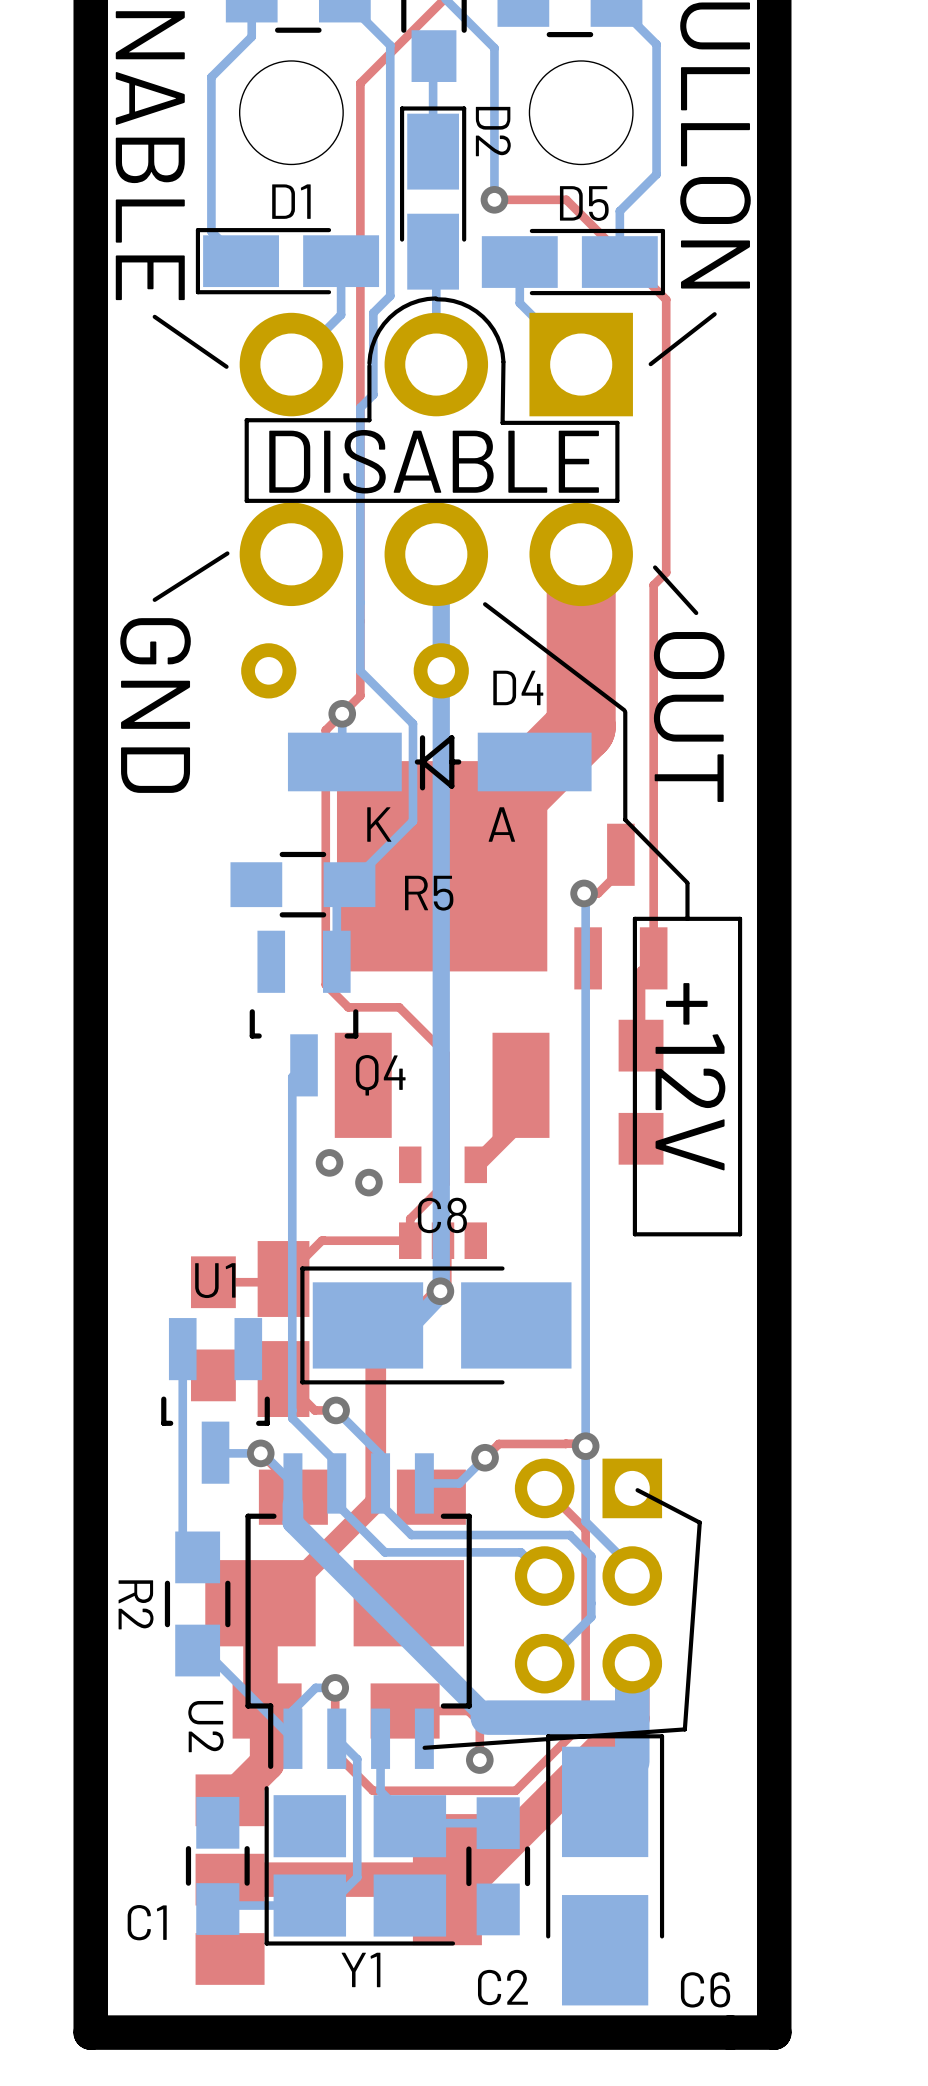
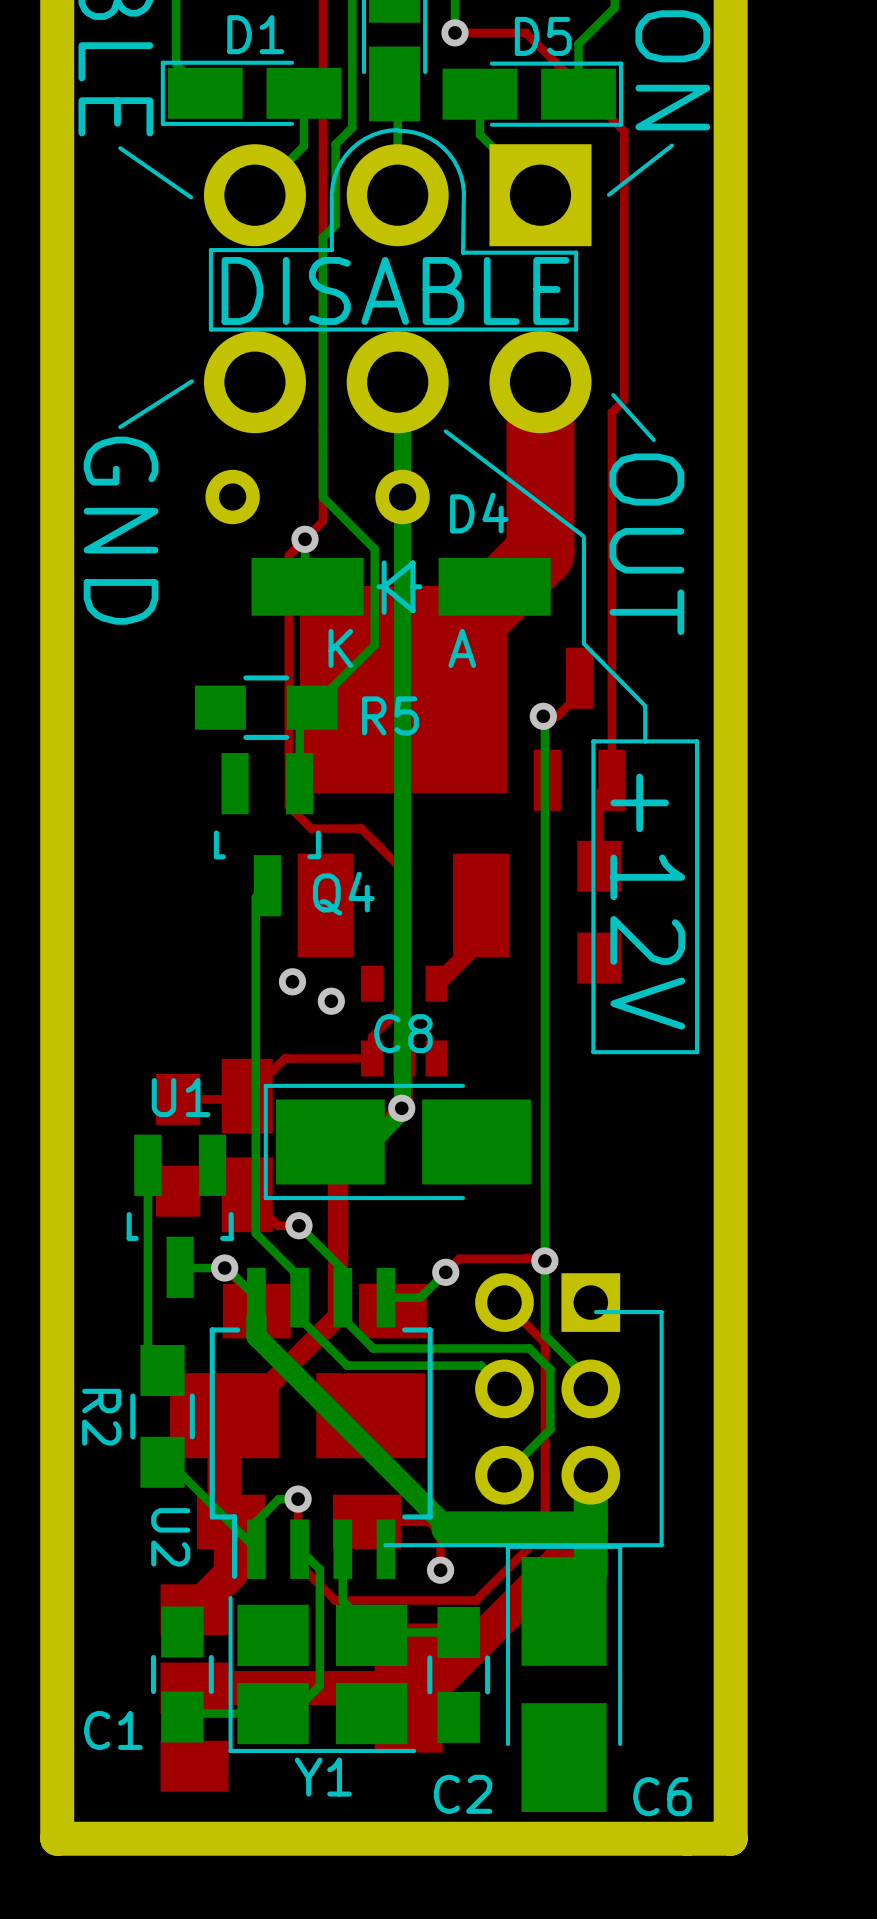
line: (637, 1490) (699, 1522) (684, 1729) (424, 1747) -> none
line: none -> (595, 1312) (661, 1312) (661, 1545) (385, 1545)

